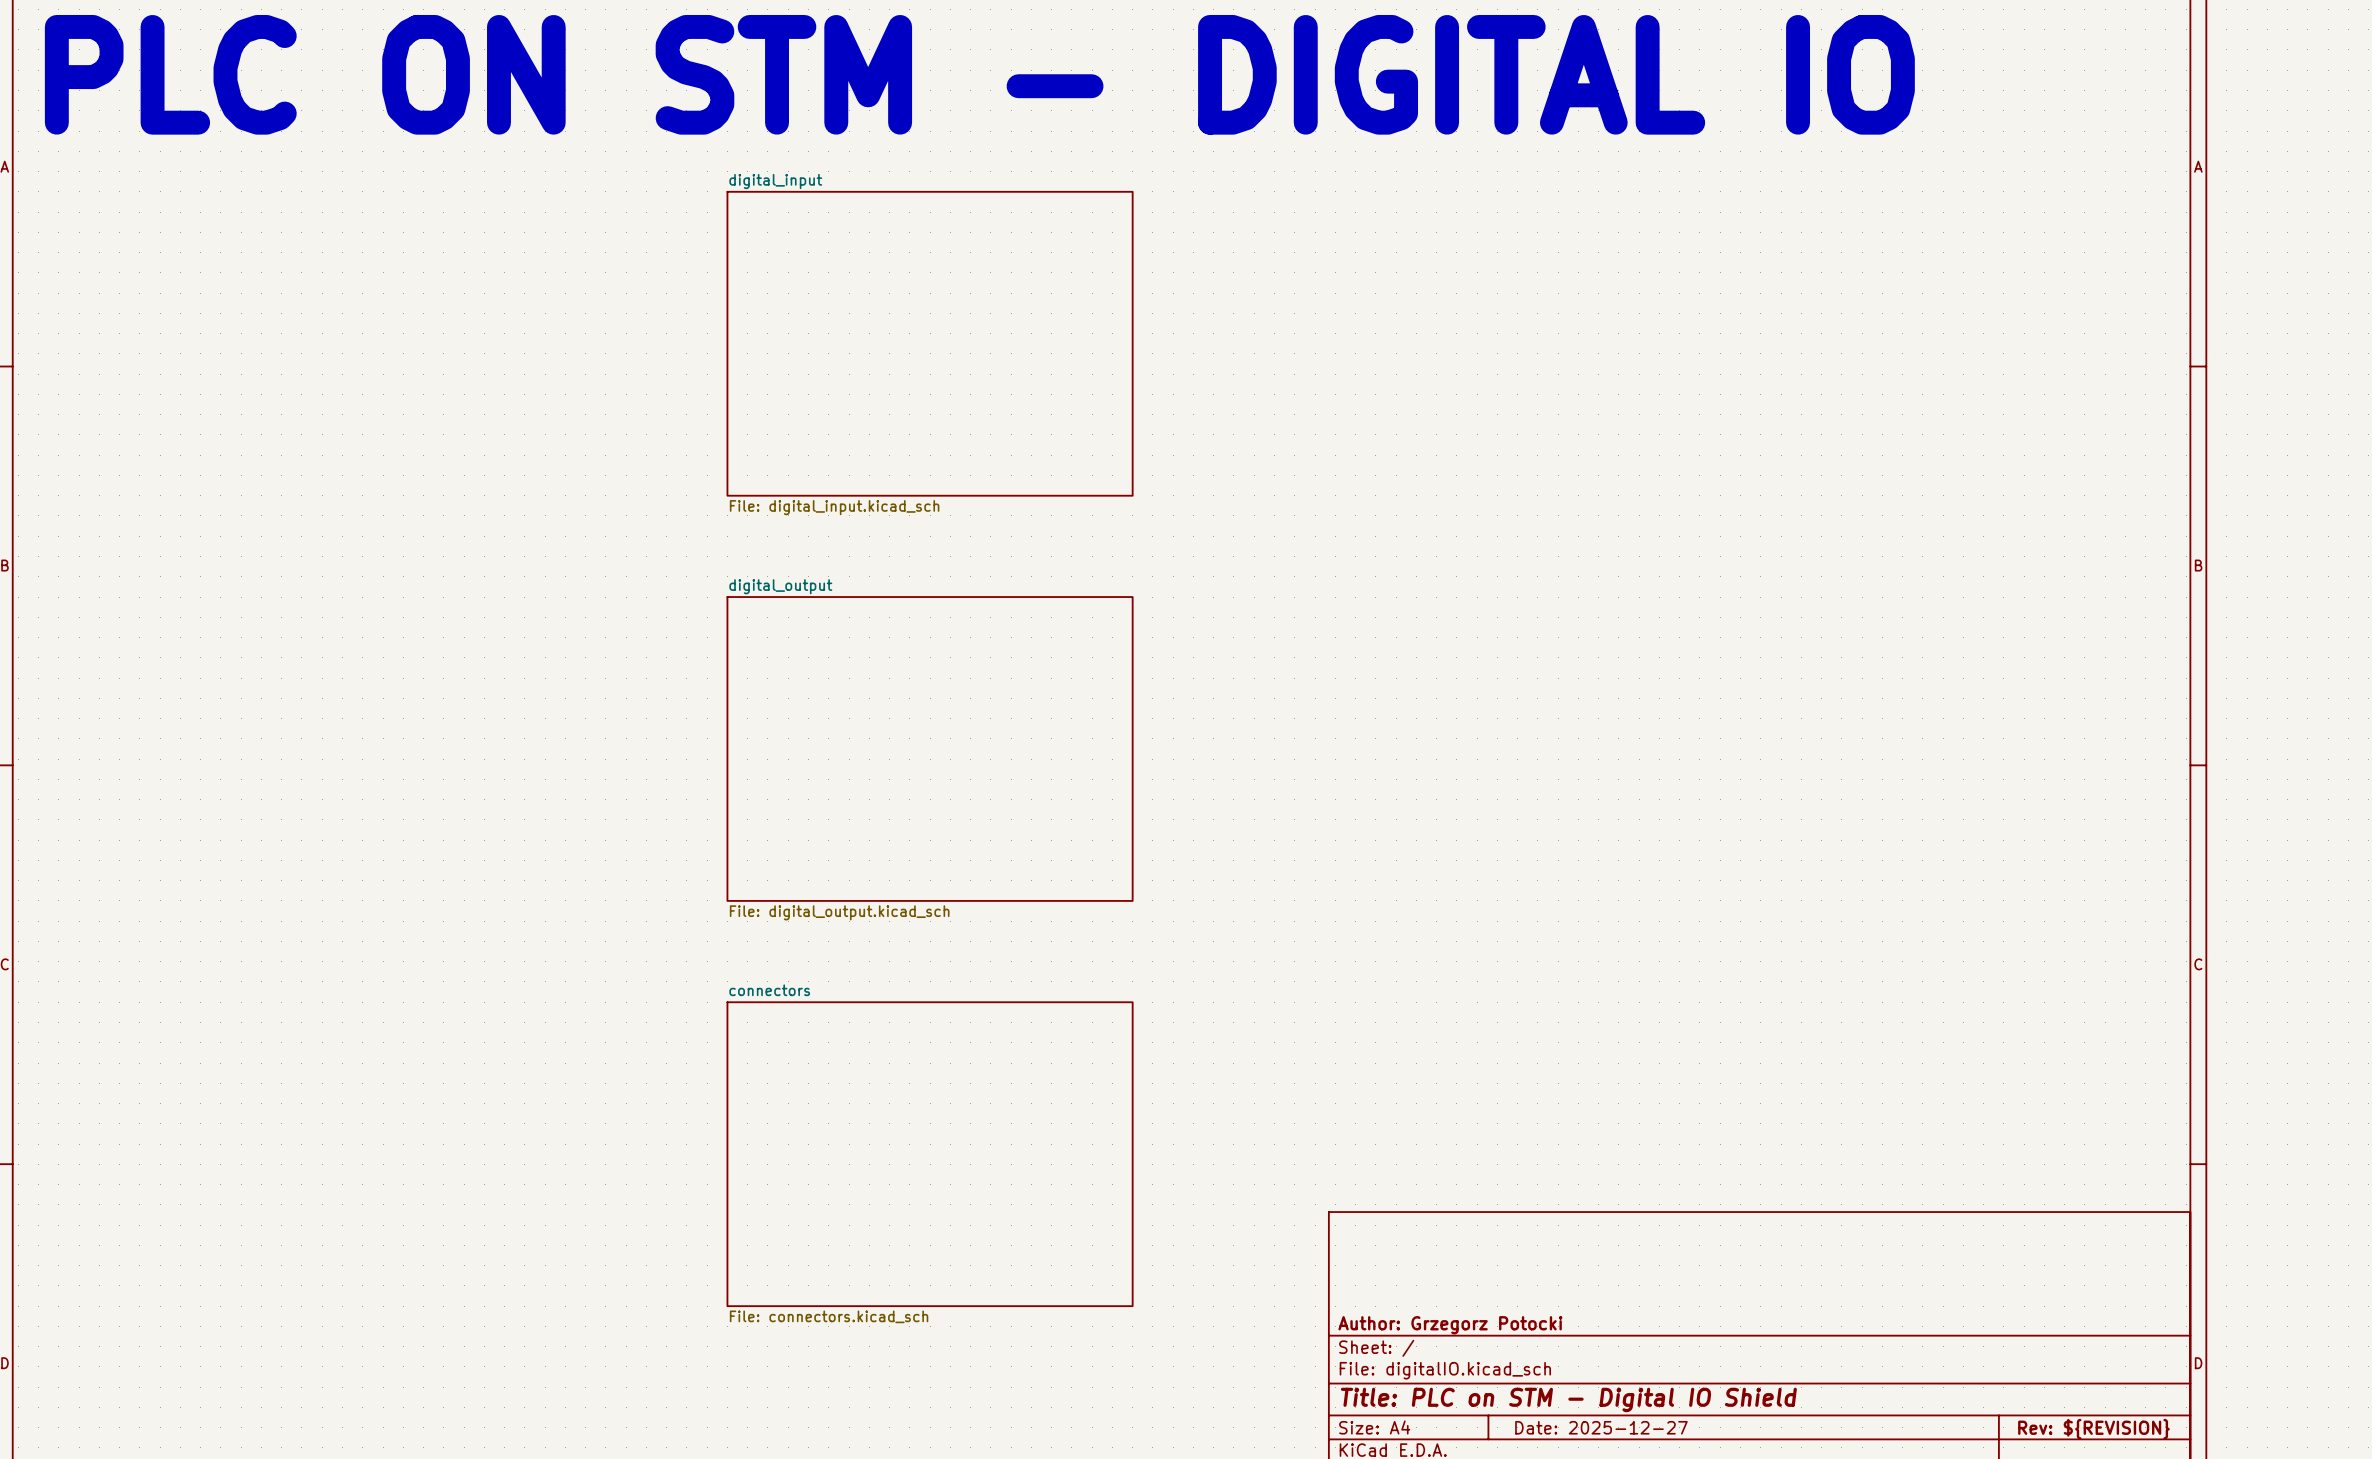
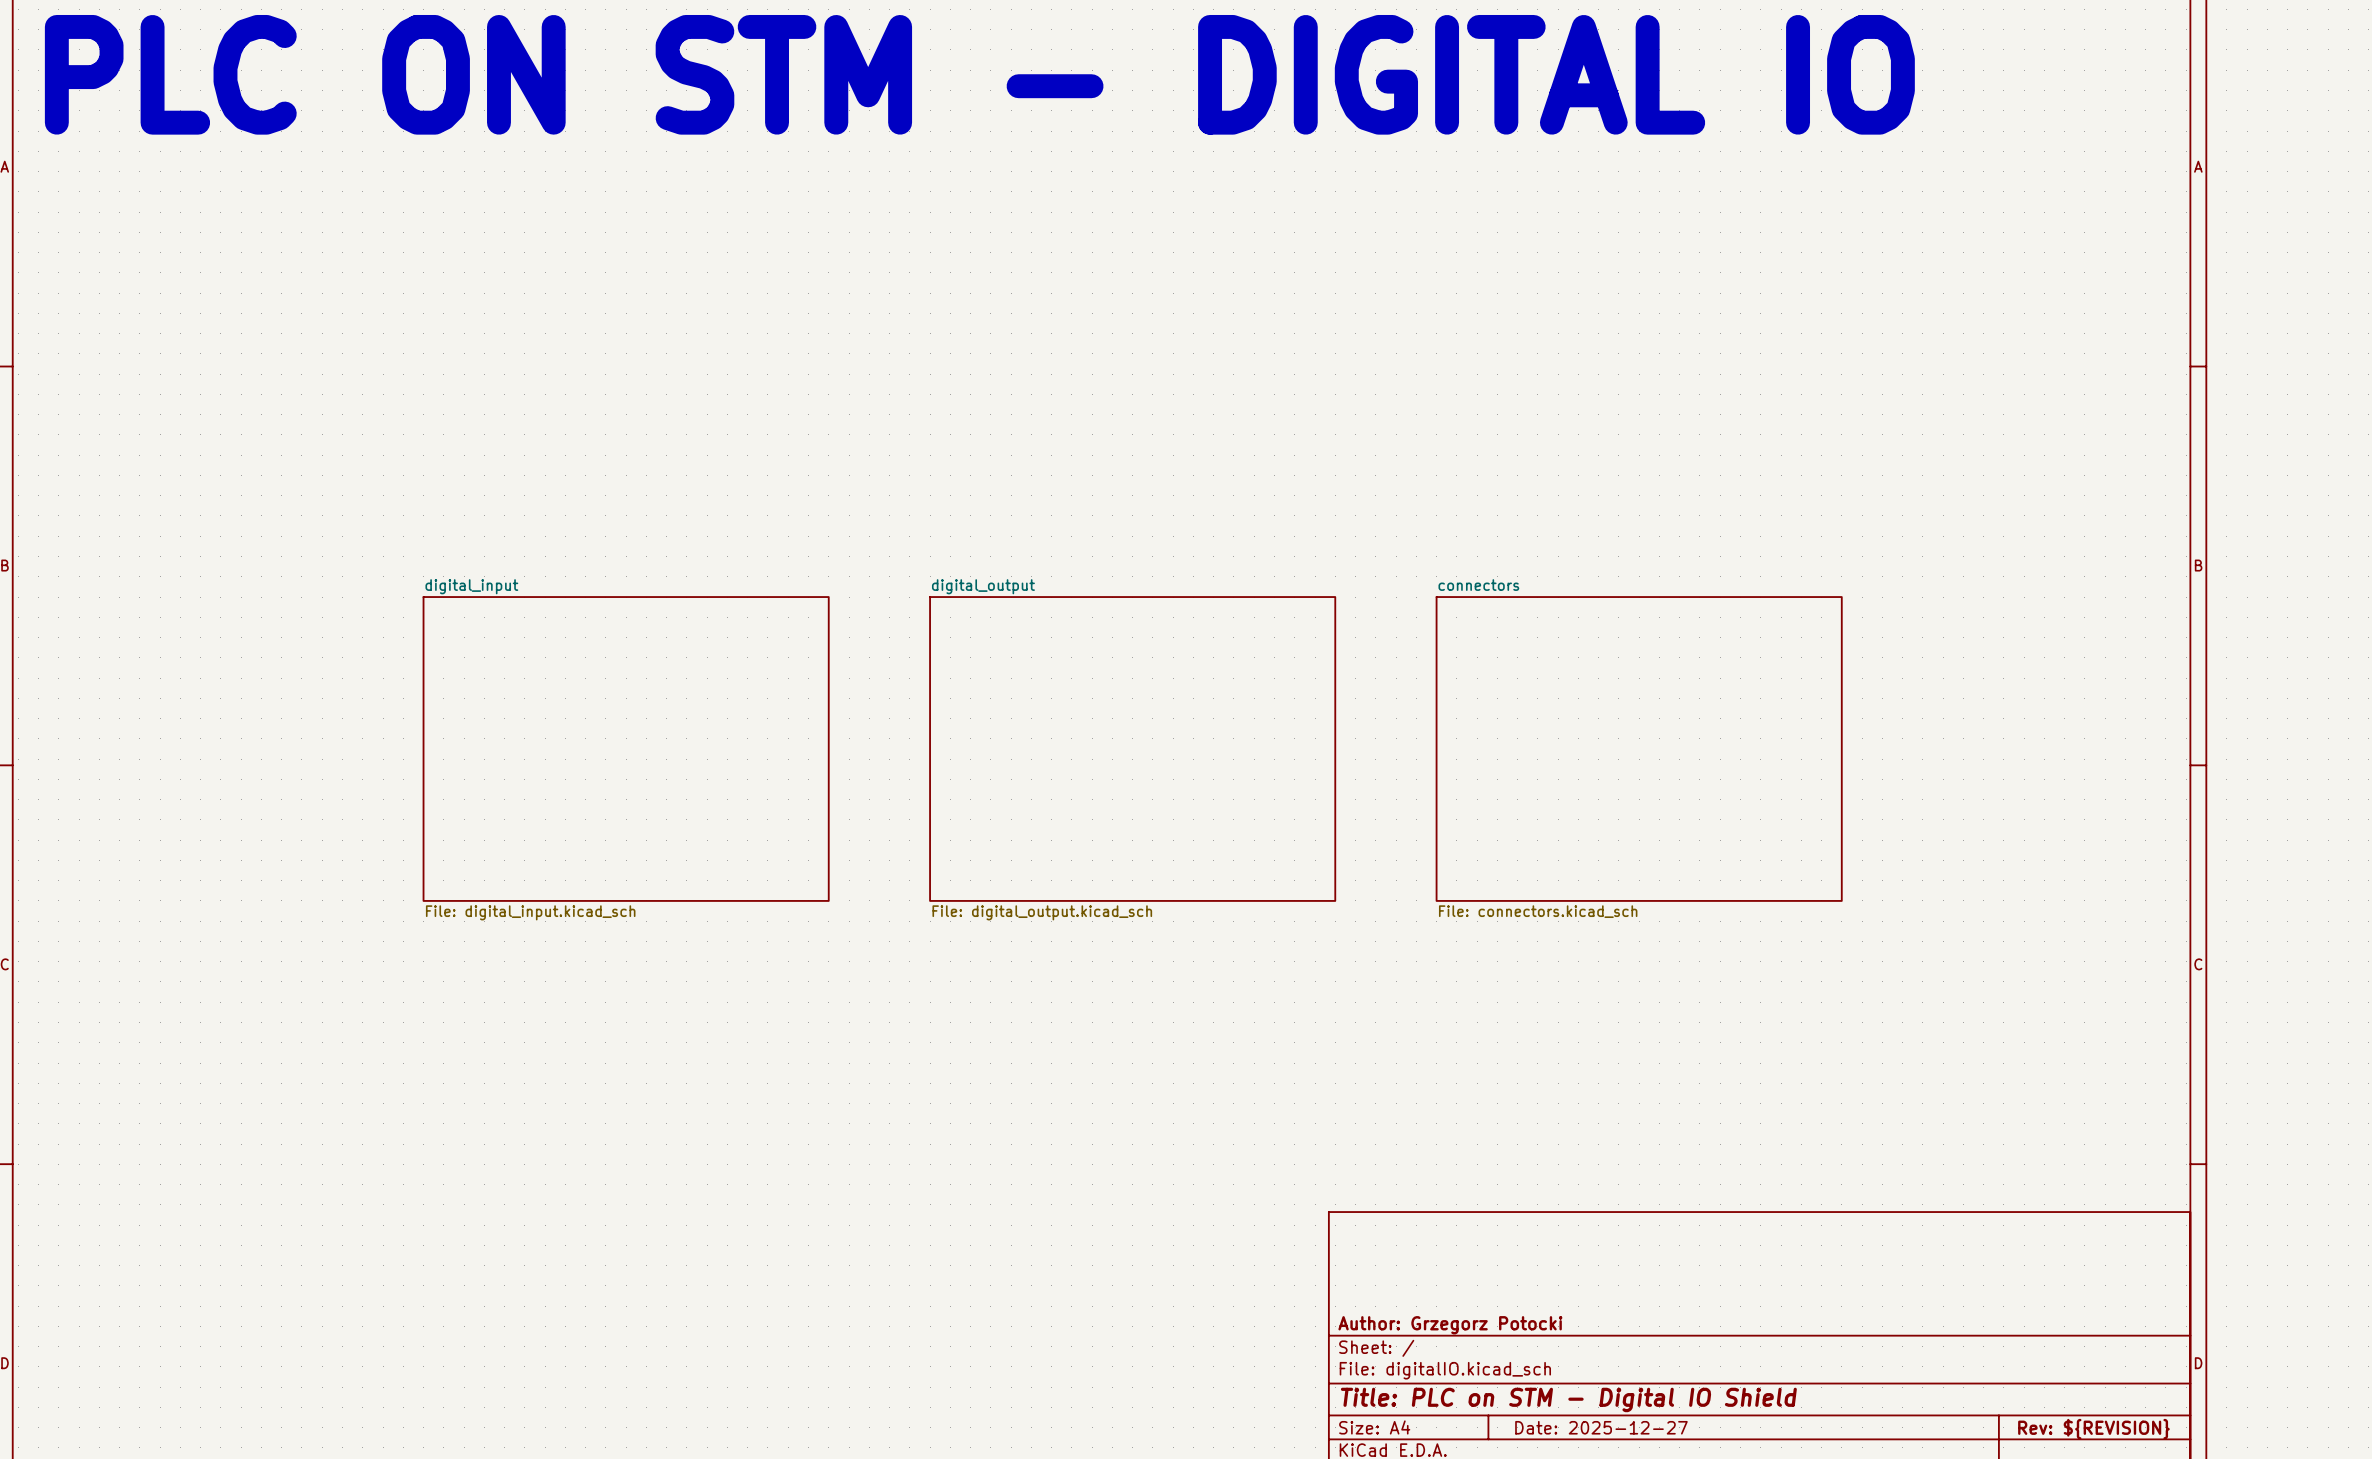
sheet digital_input: File: digital_input.kicad_sch (930, 343) -> none
sheet digital_input: none -> File: digital_input.kicad_sch (626, 748)
sheet digital_output: File: digital_output.kicad_sch (930, 748) -> none
sheet digital_output: none -> File: digital_output.kicad_sch (1132, 748)
sheet connectors: none -> File: connectors.kicad_sch (1639, 748)
sheet connectors: File: connectors.kicad_sch (930, 1154) -> none

